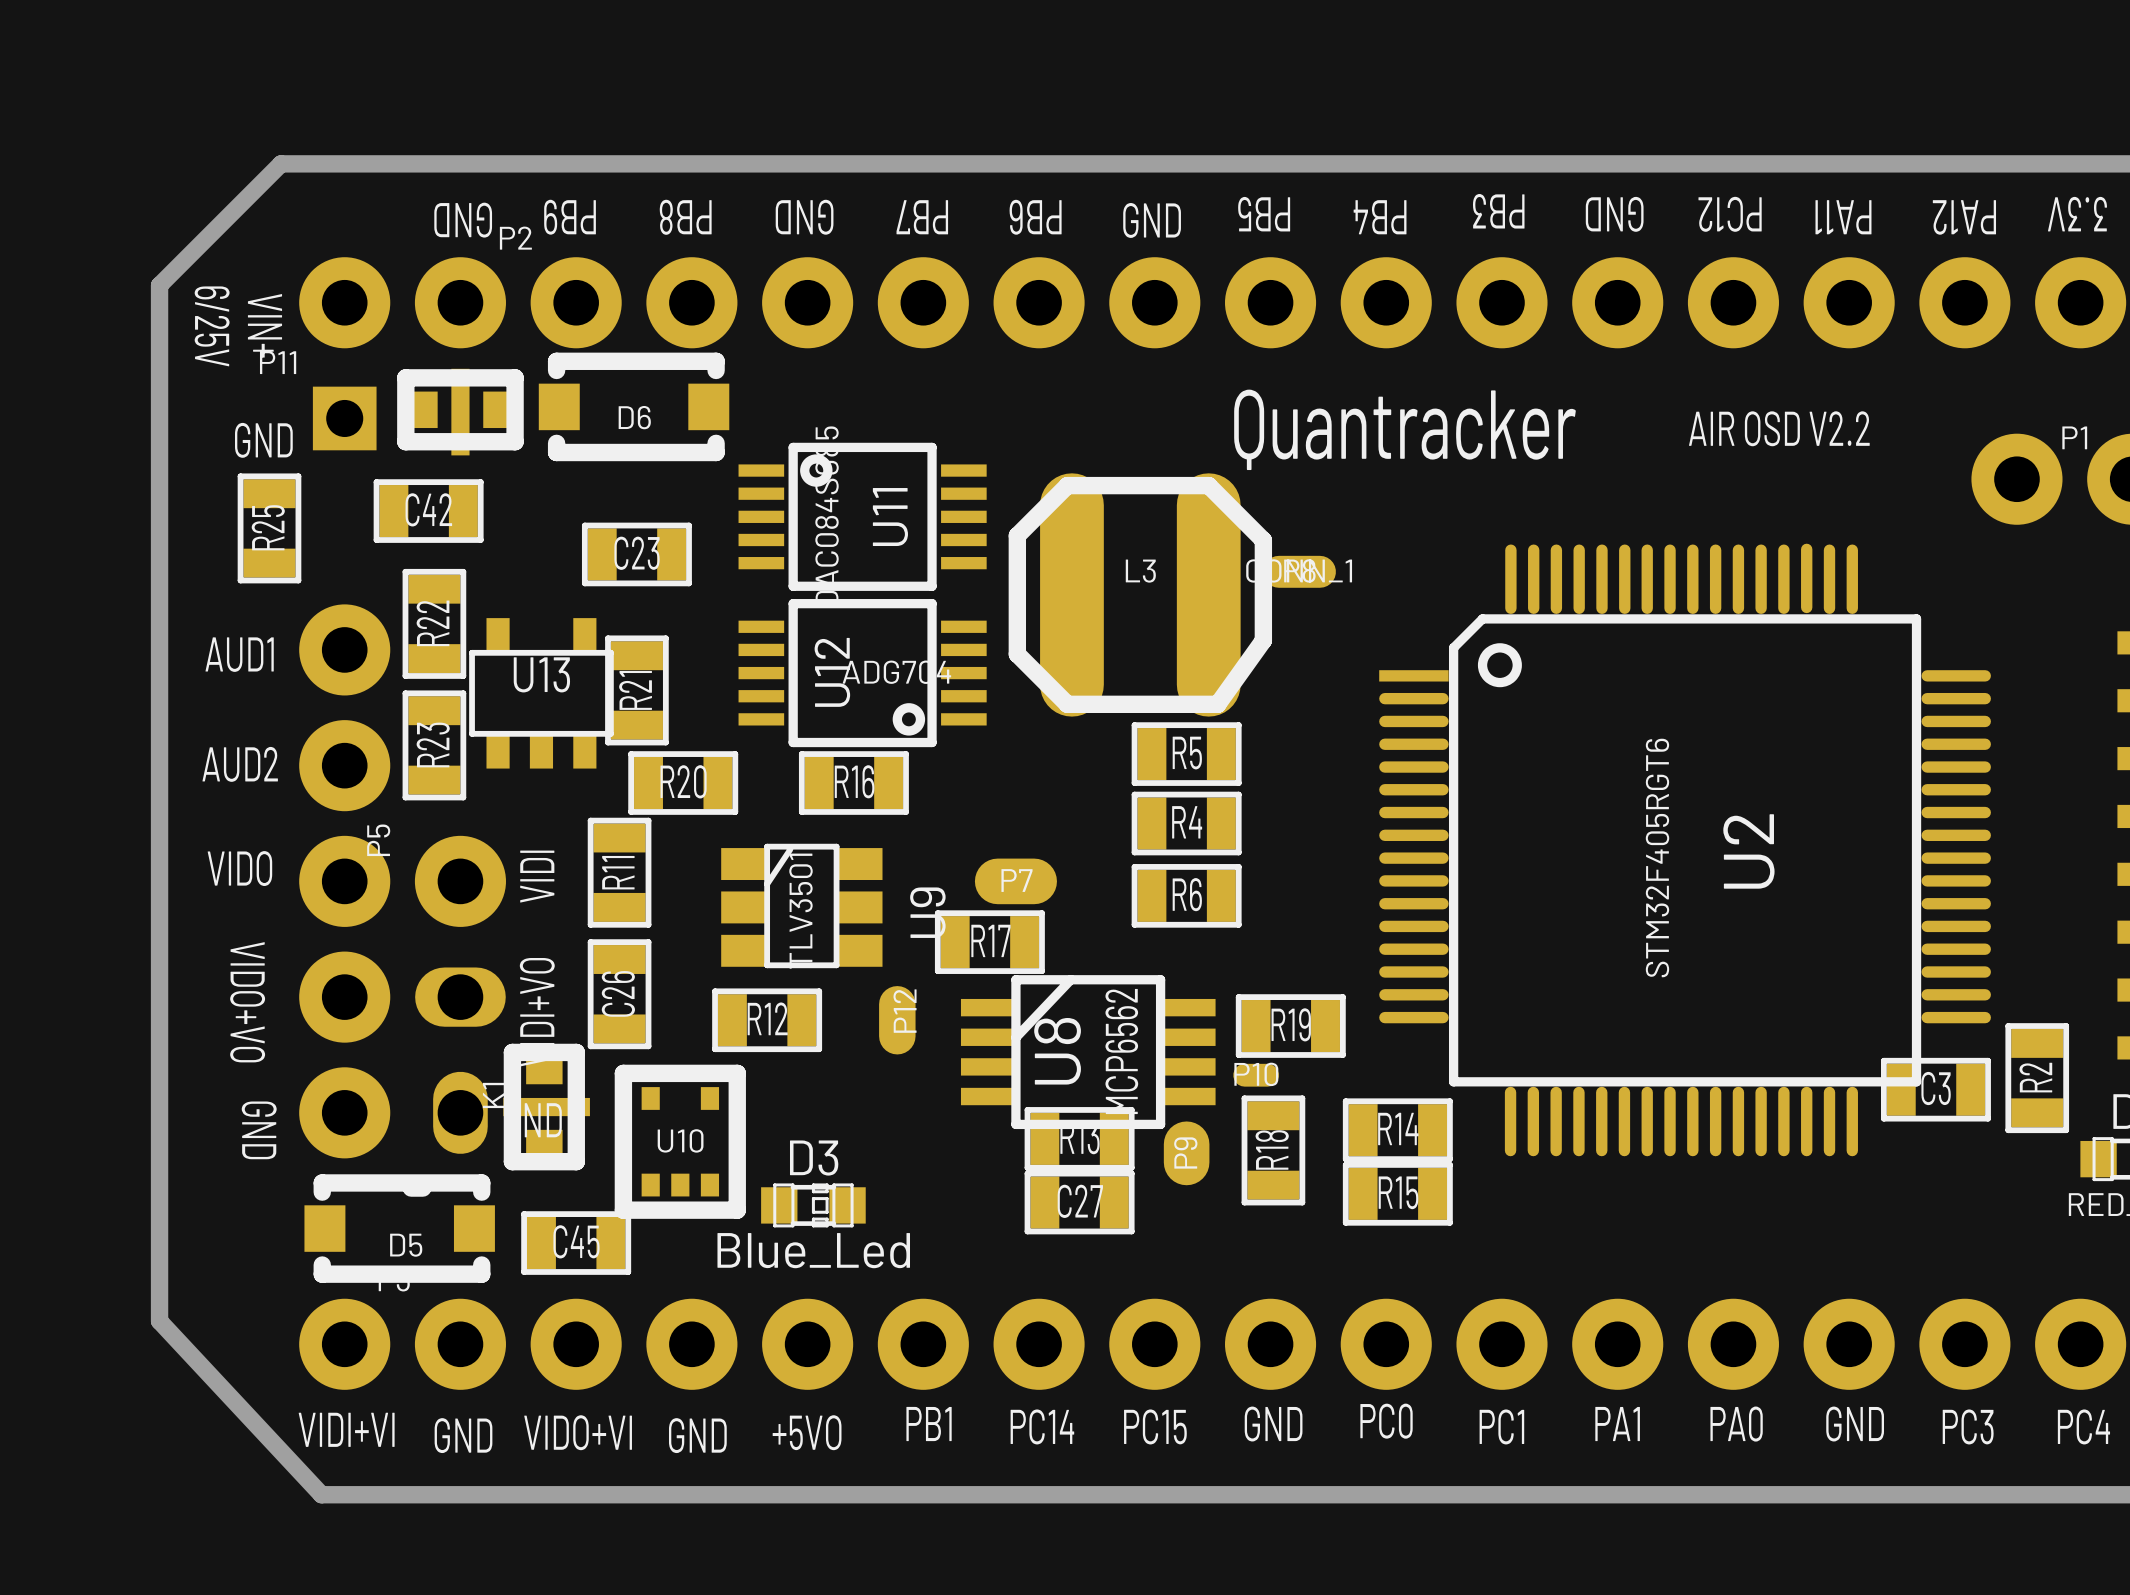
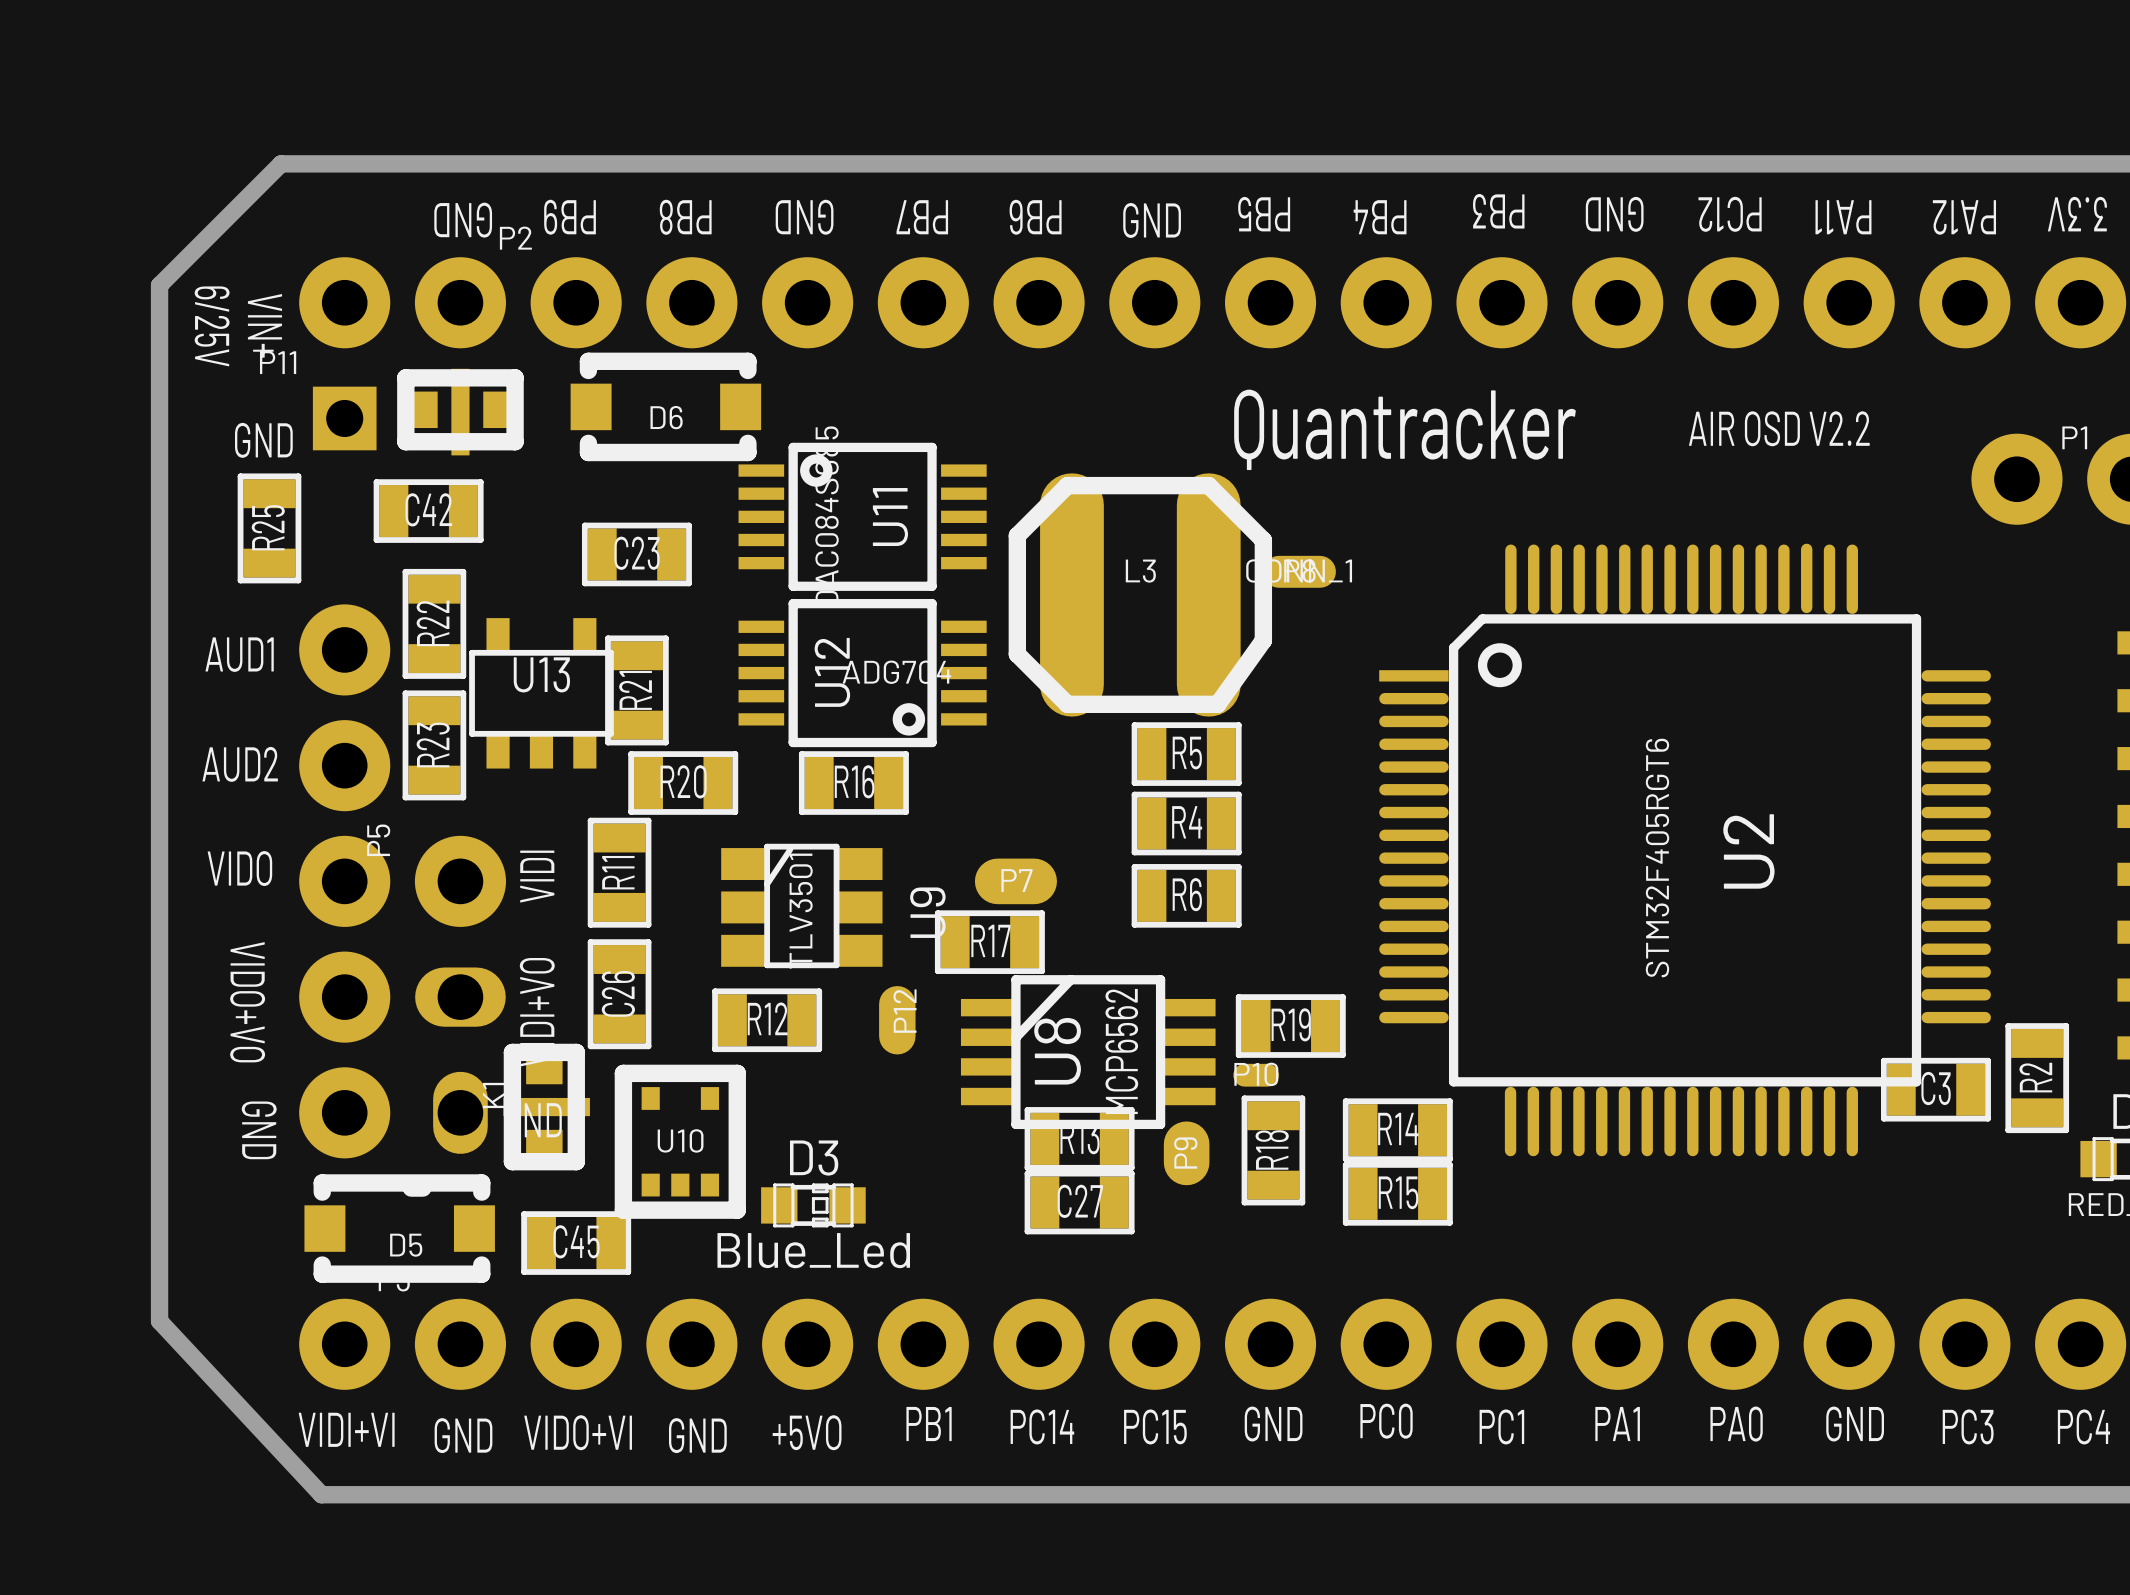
D6 position: (634, 406) -> (665, 406)

